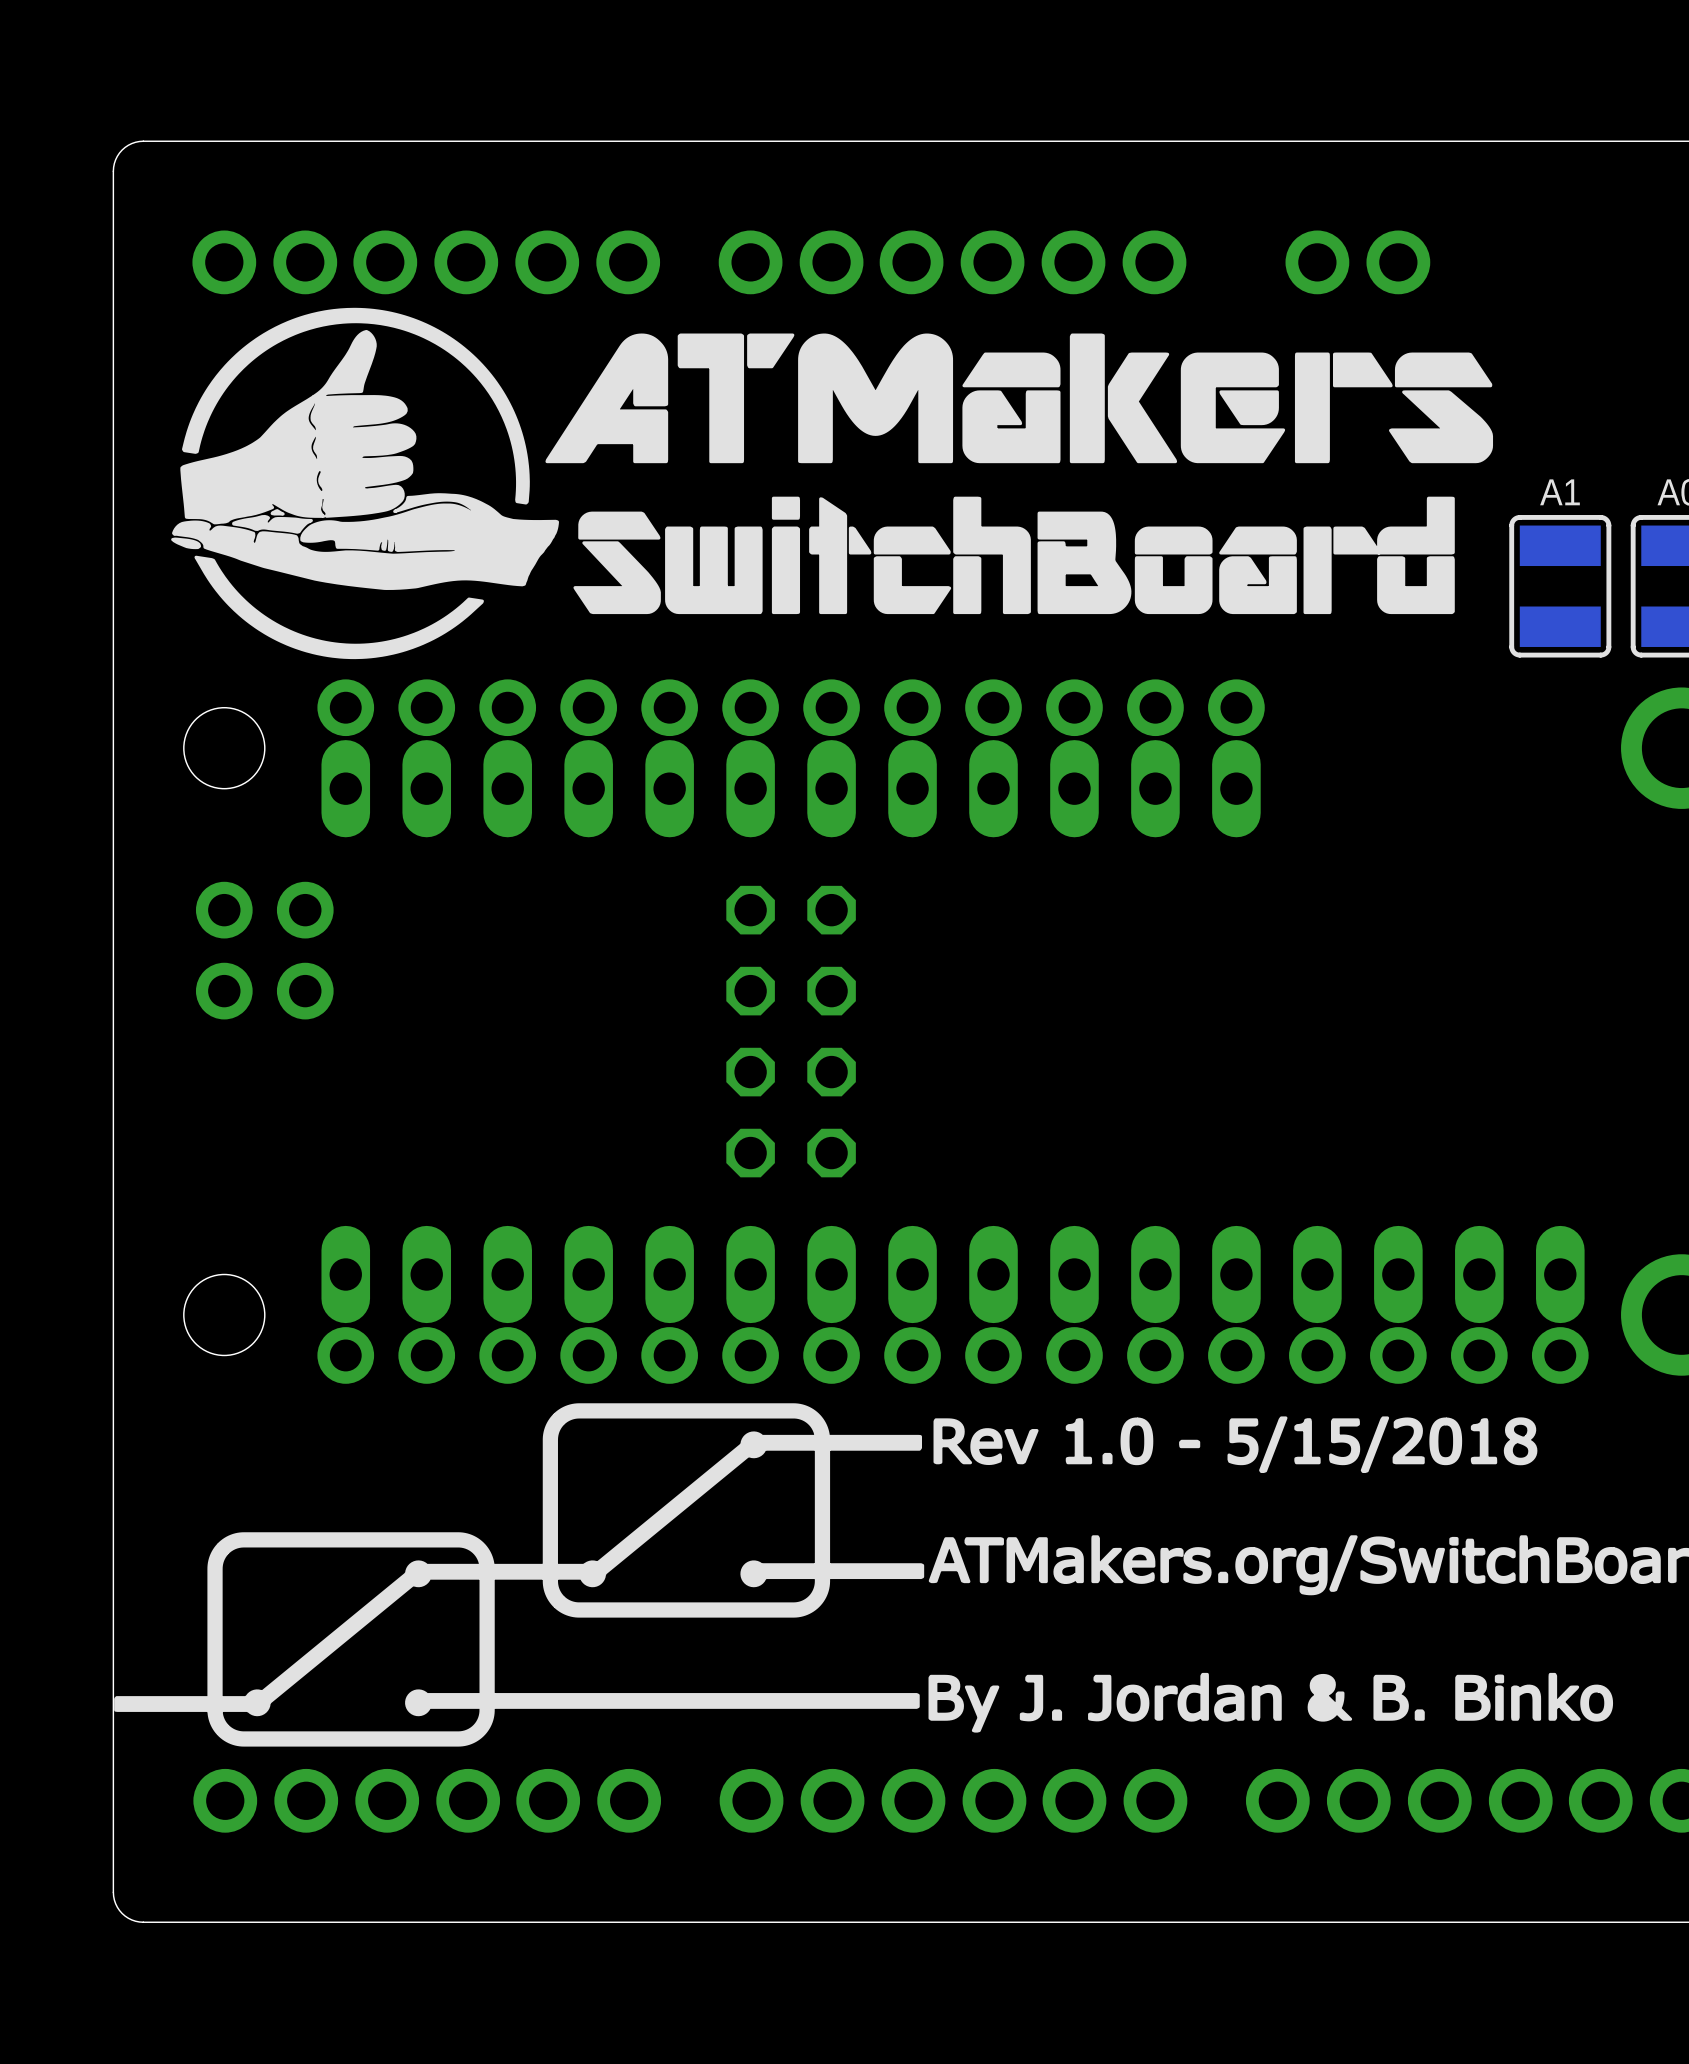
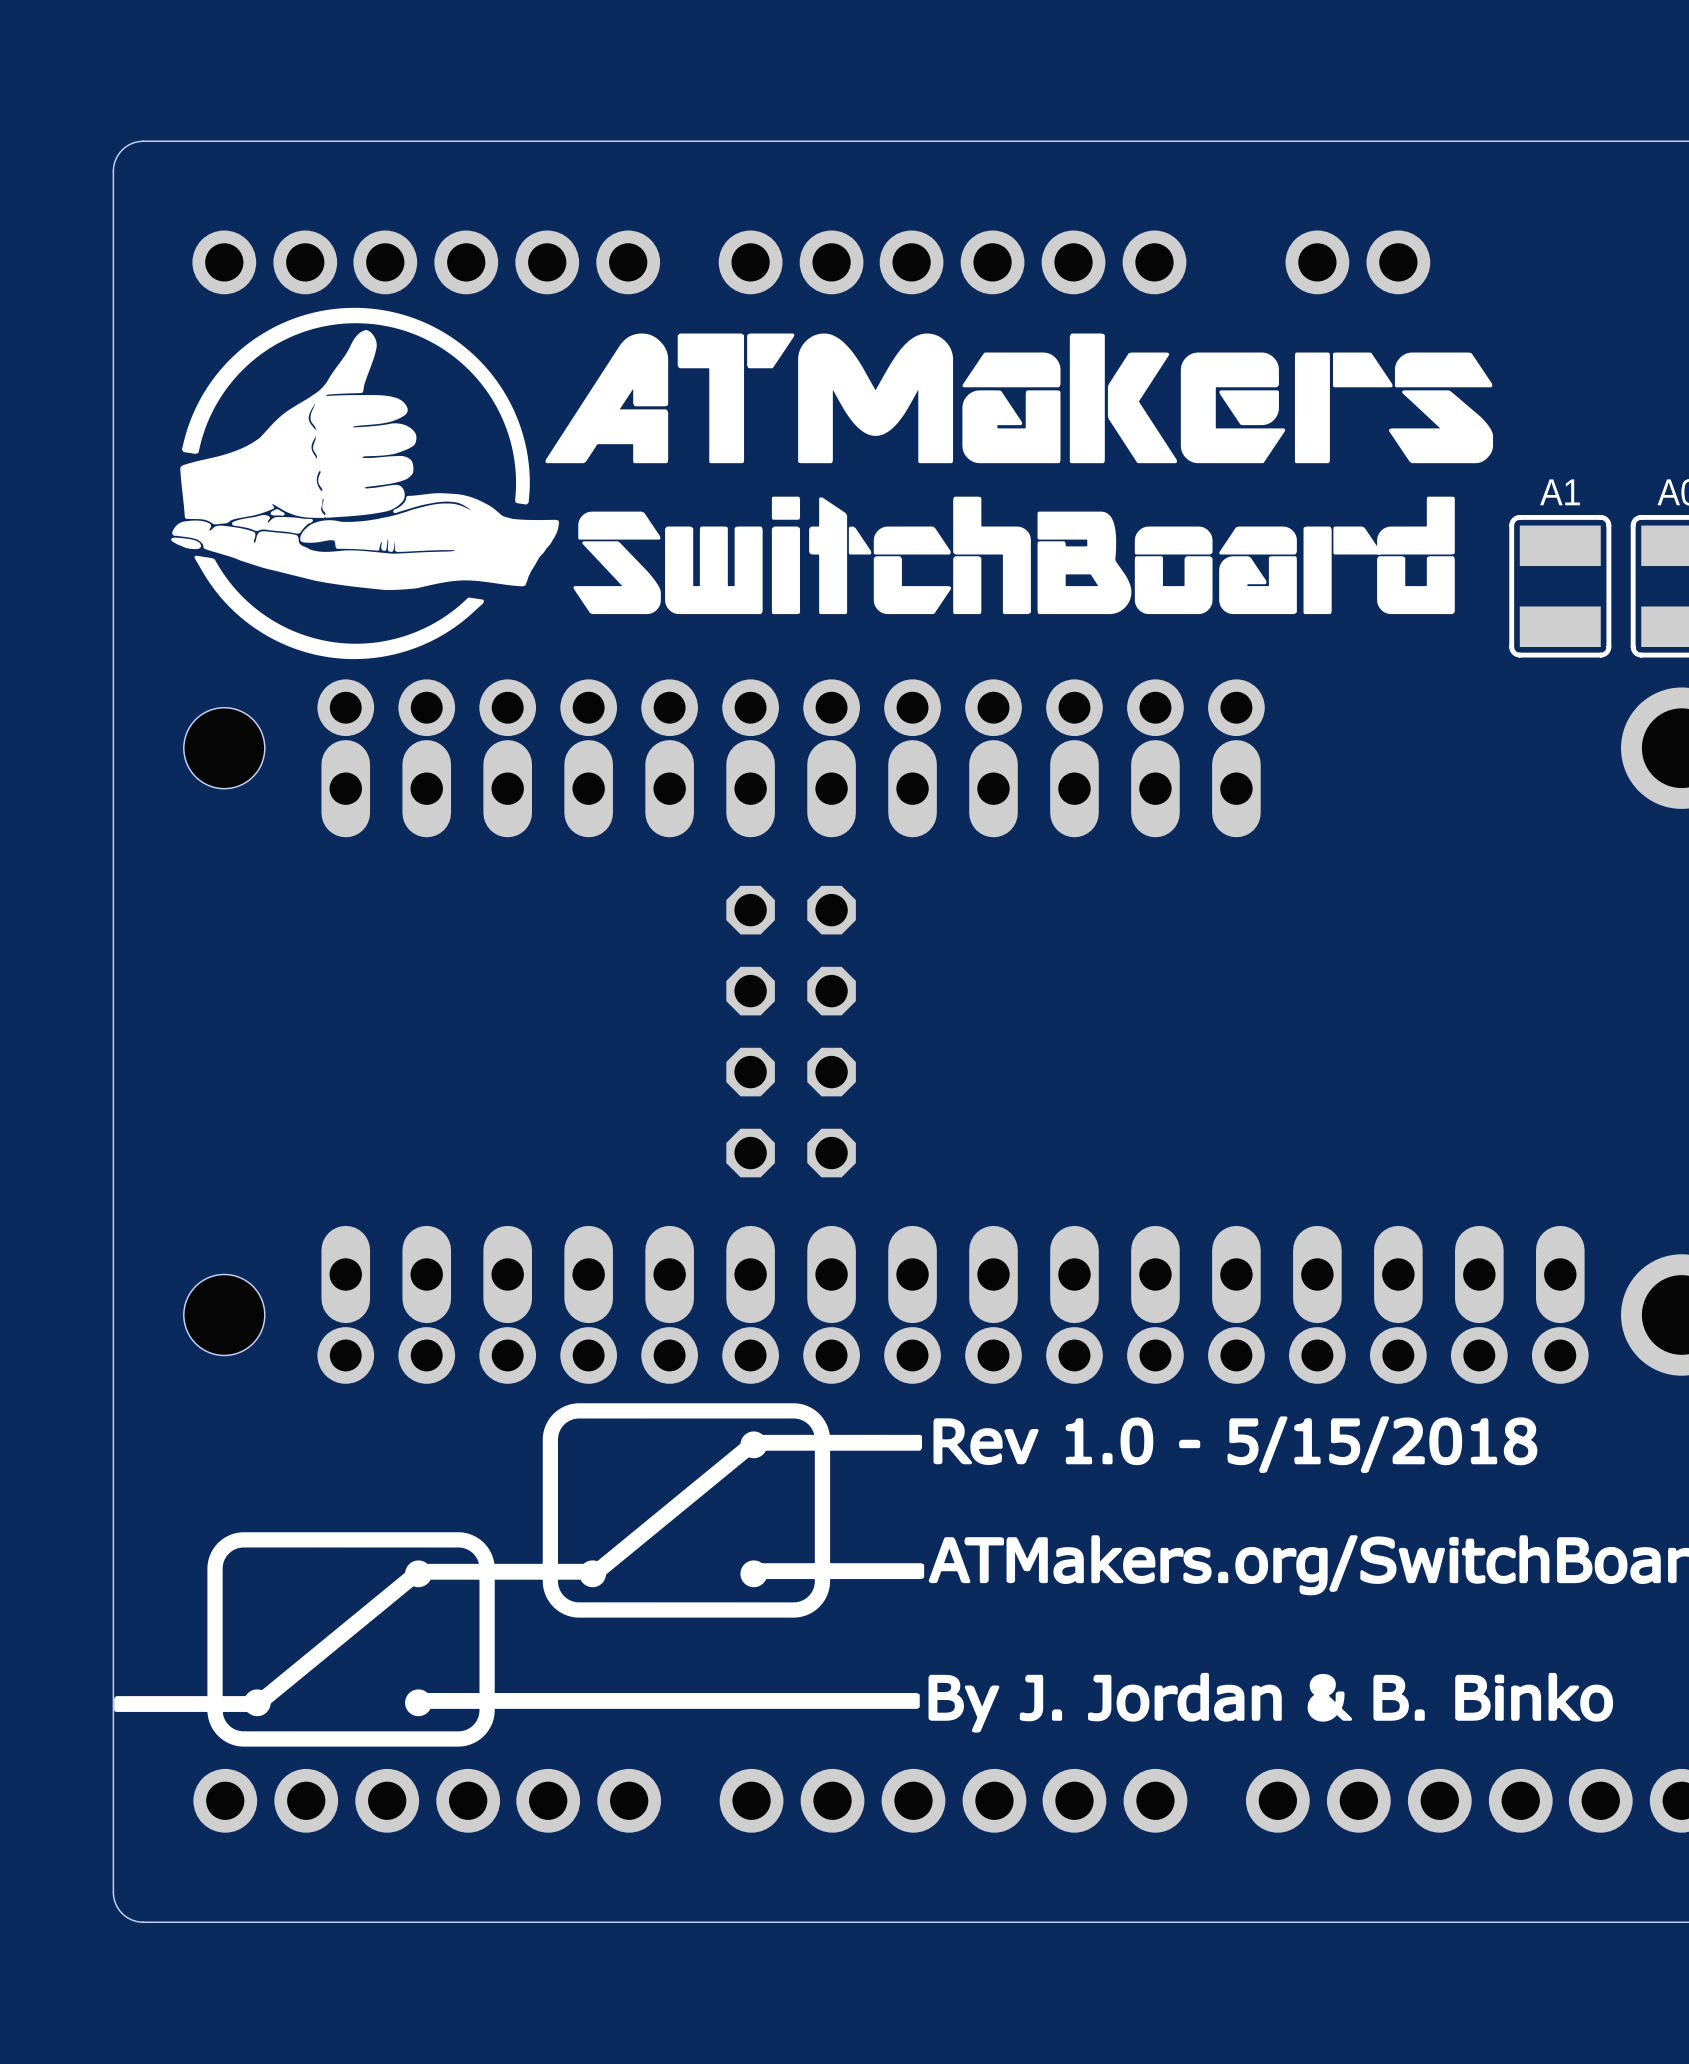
part: (224, 910) -> none
part: (305, 910) -> none
part: (224, 991) -> none
part: (305, 991) -> none

